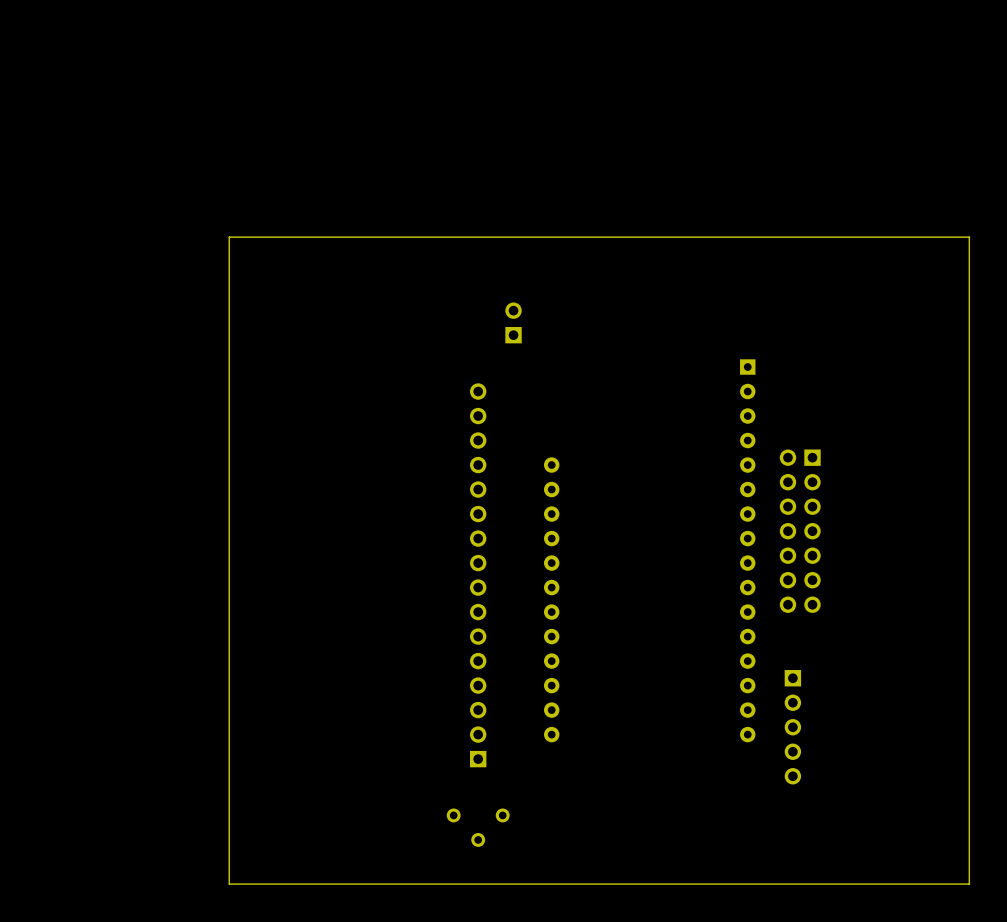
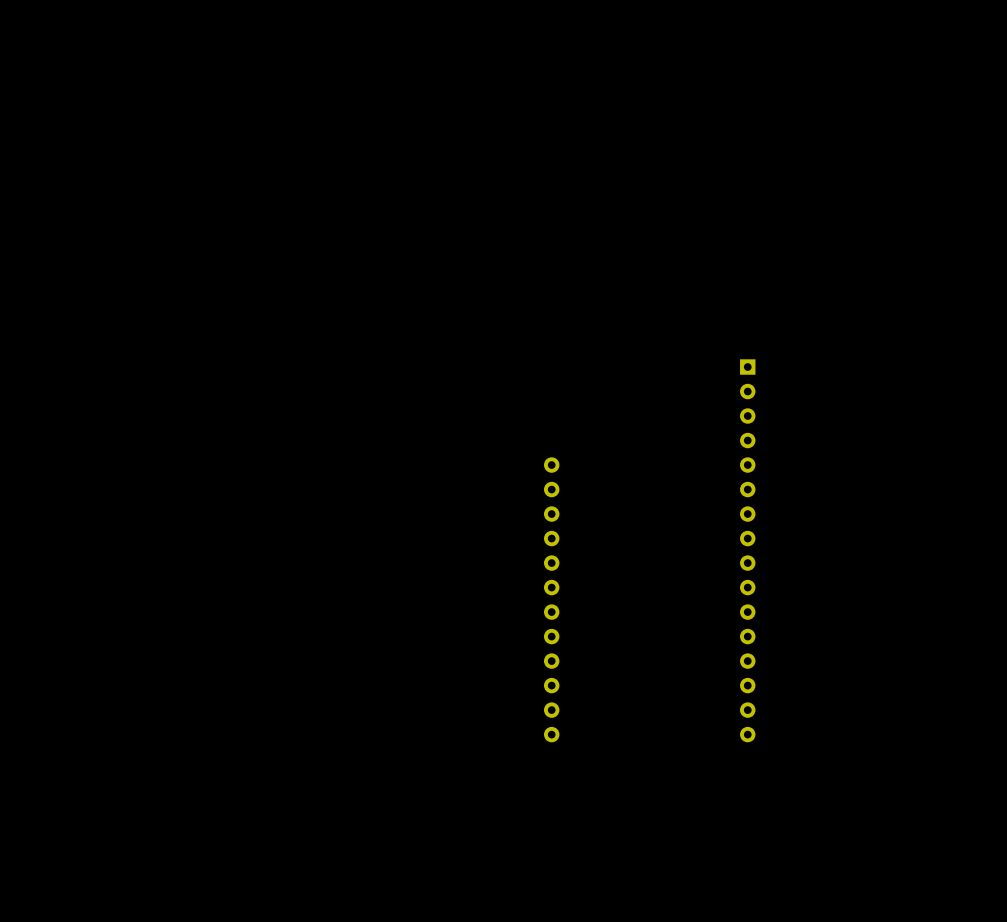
board edge: (969, 237) (229, 237) (229, 884) (969, 884) (969, 237) -> none
part: (513, 322) -> none
part: (800, 531) -> none
part: (478, 575) -> none
part: (792, 727) -> none
part: (478, 827) -> none

